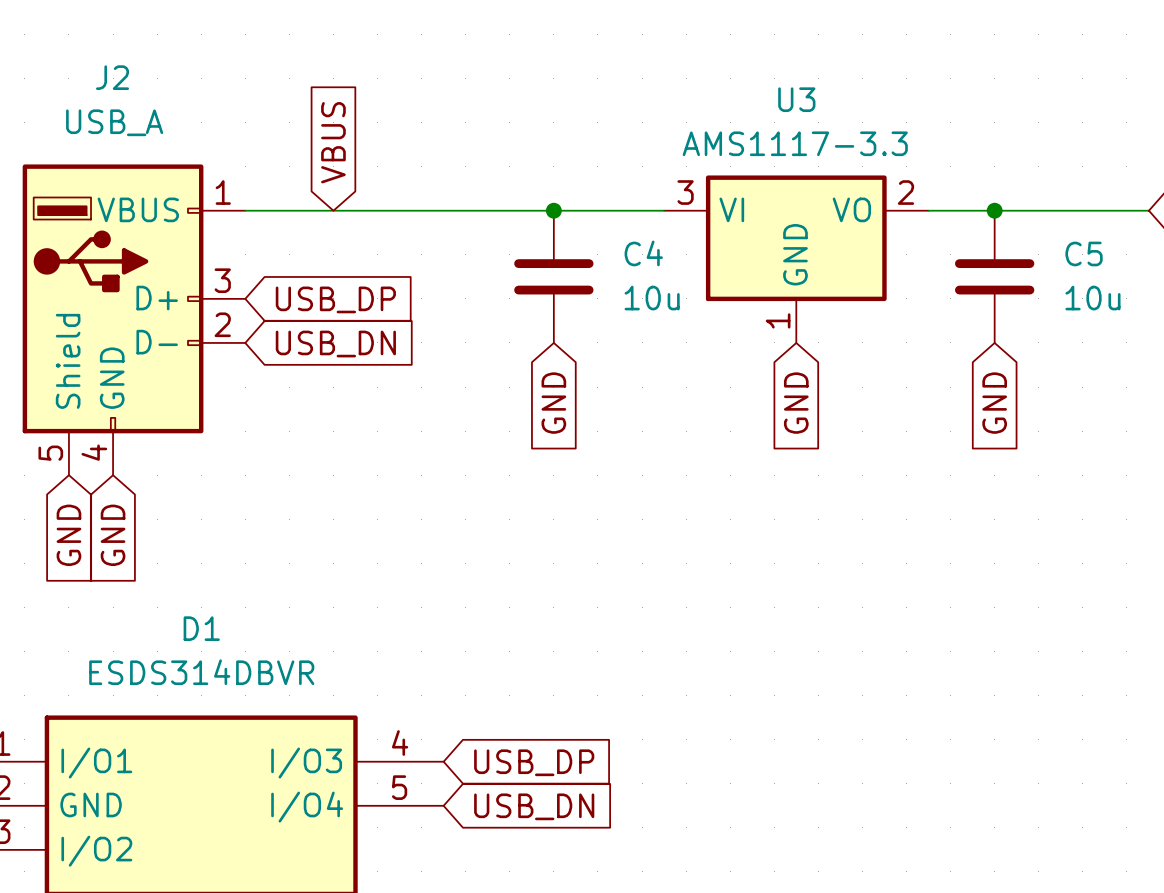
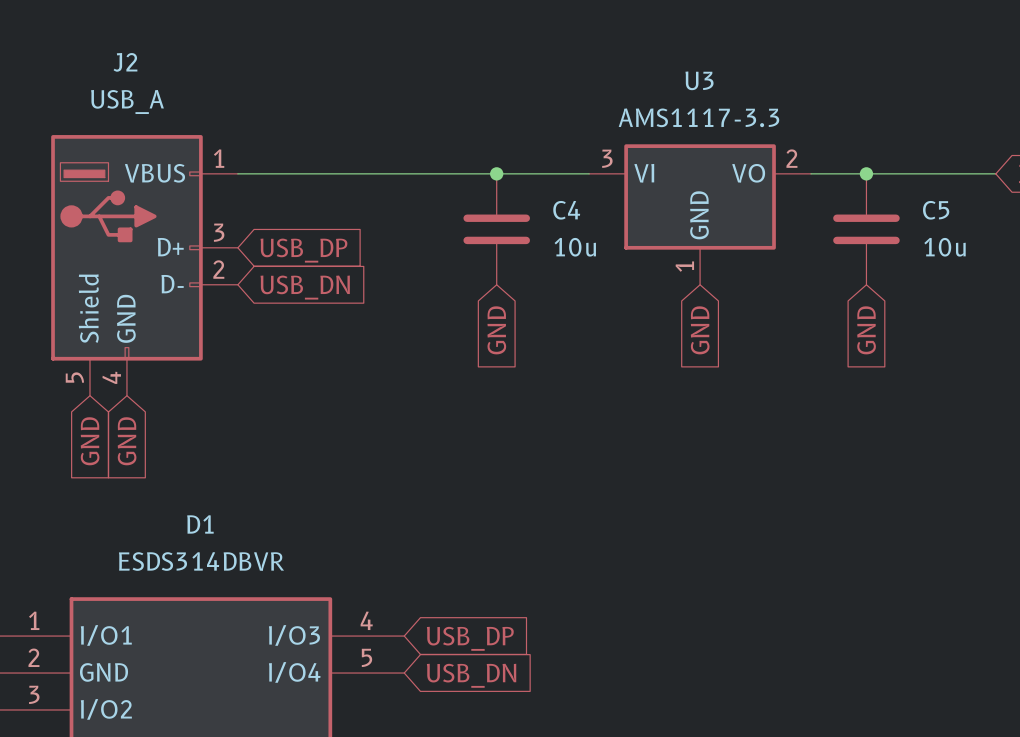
global label: VBUS (333, 142) -> none

